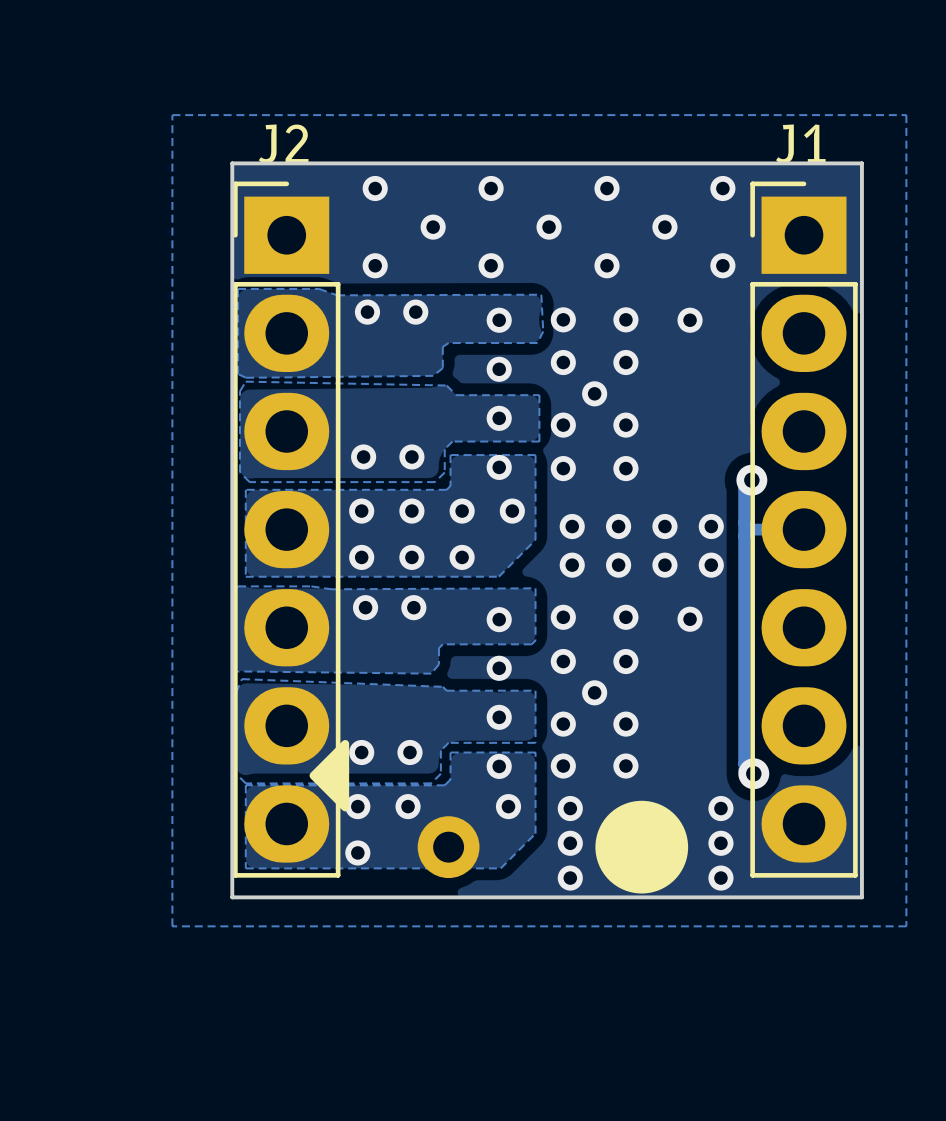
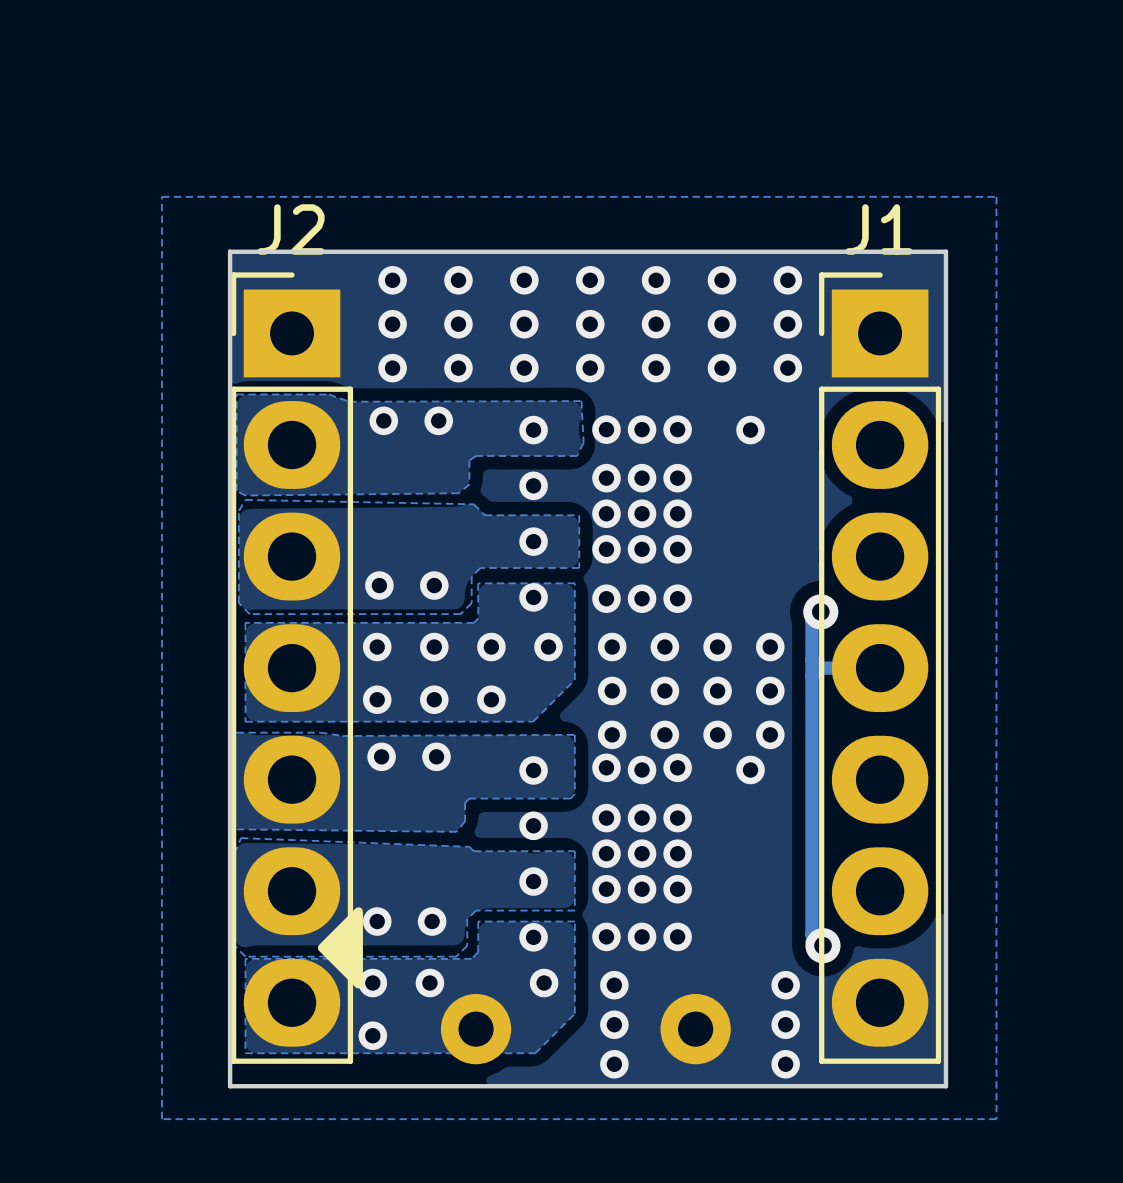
via: none -> (458, 280)
via: none -> (590, 280)
via: none -> (721, 280)
via: none -> (392, 324)
via: none -> (524, 324)
via: none -> (656, 324)
via: none -> (787, 324)
via: none -> (458, 368)
via: none -> (590, 368)
via: none -> (721, 368)
via: none -> (642, 429)
via: none -> (642, 478)
via: none -> (606, 513)
via: none -> (677, 513)
via: none -> (642, 549)
via: none -> (642, 598)
via: none -> (612, 647)
via: none -> (664, 647)
via: none -> (717, 647)
via: none -> (770, 647)
via: (572, 526) -> none
via: (618, 526) -> none
via: (664, 526) -> none
via: (711, 526) -> none
via: none -> (612, 690)
via: none -> (664, 690)
via: none -> (717, 690)
via: none -> (770, 690)
via: (572, 565) -> none
via: (618, 565) -> none
via: (664, 565) -> none
via: (711, 565) -> none
via: none -> (612, 734)
via: none -> (664, 734)
via: none -> (717, 734)
via: none -> (770, 734)
via: none -> (642, 770)
via: none -> (642, 818)
via: none -> (606, 853)
via: none -> (677, 853)
via: none -> (642, 889)
via: none -> (642, 936)
drawing: [595, 800, 689, 894] -> none

